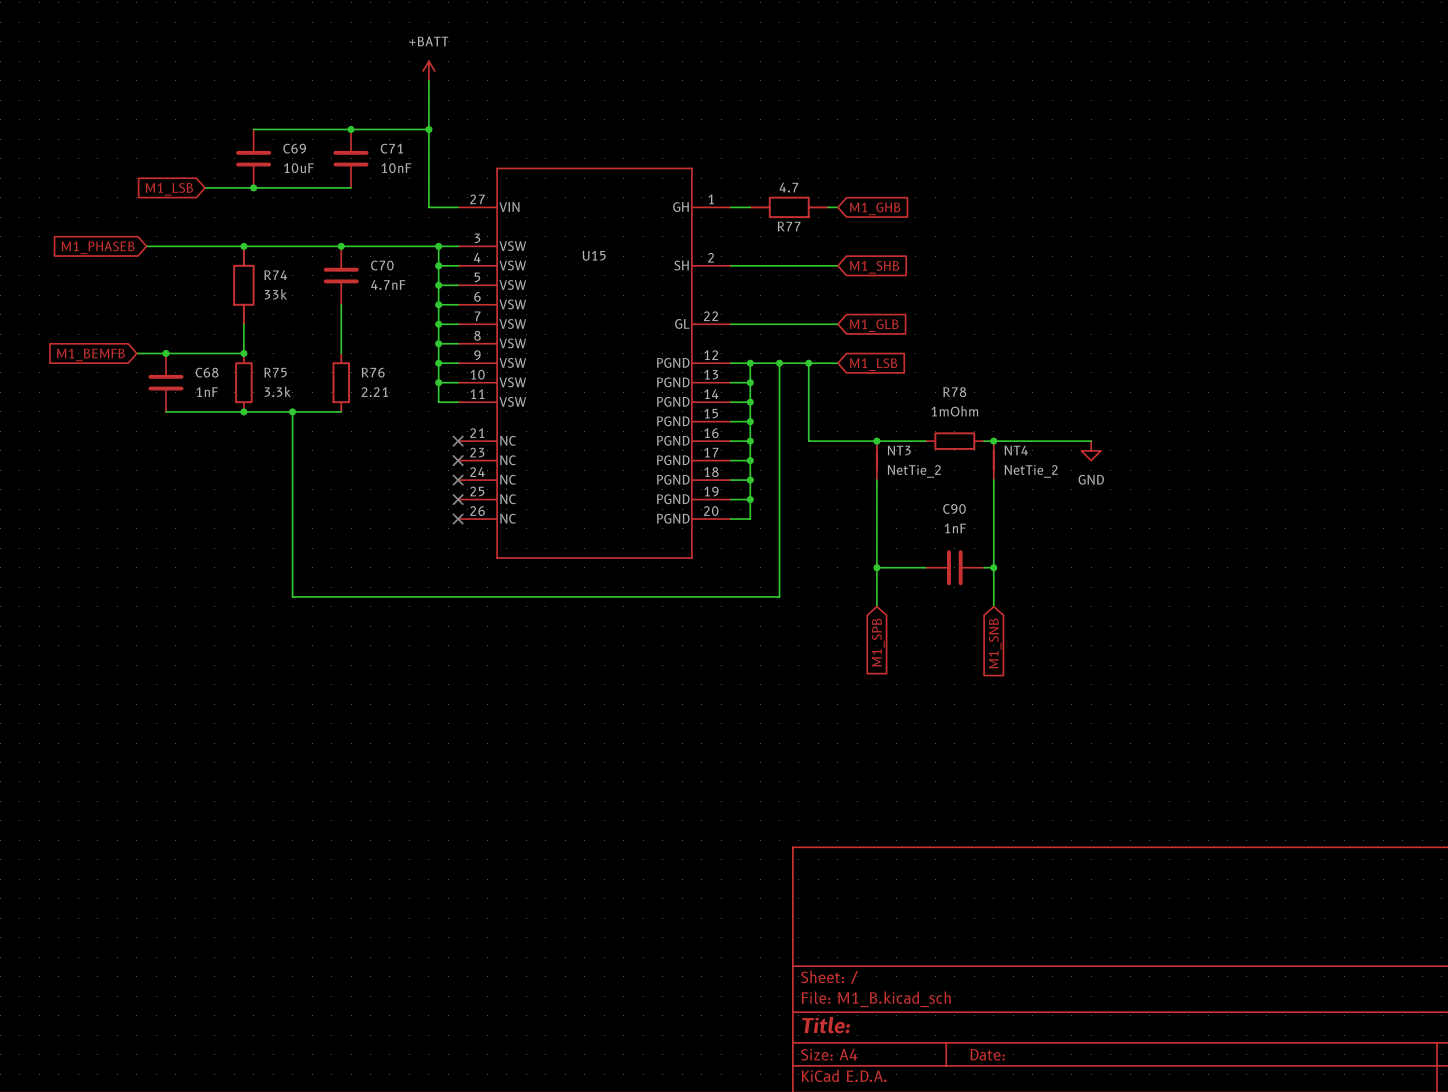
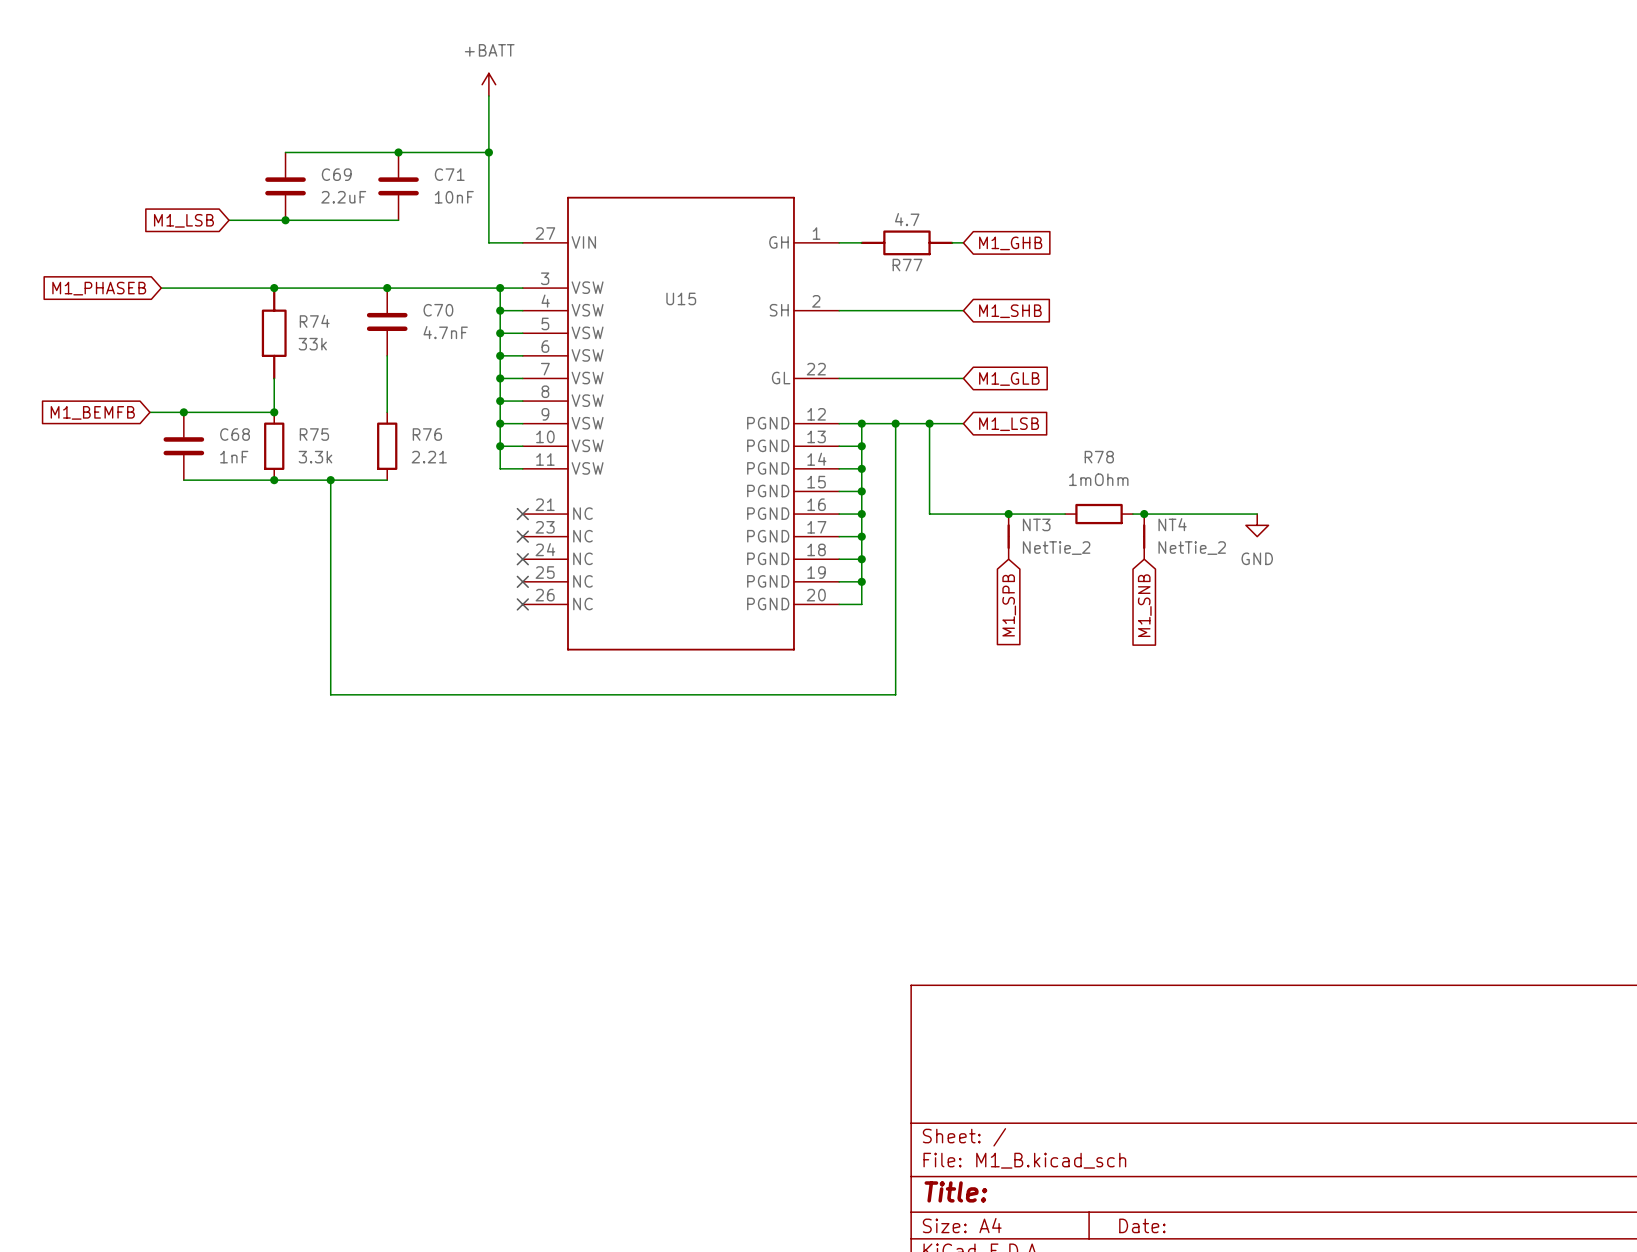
C69 value: 10uF (298, 168) -> 2.2uF (343, 197)
wire: (876, 480) (876, 606) -> none
wire: (993, 480) (993, 606) -> none
wire: (876, 567) (925, 567) -> none
junction: (876, 567) -> none
C90: 1nF (954, 567) -> none
wire: (984, 567) (993, 567) -> none
junction: (993, 567) -> none
global label position: M1_SPB (878, 642) -> M1_SPB (1009, 605)
global label position: M1_SNB (995, 643) -> M1_SNB (1144, 605)

